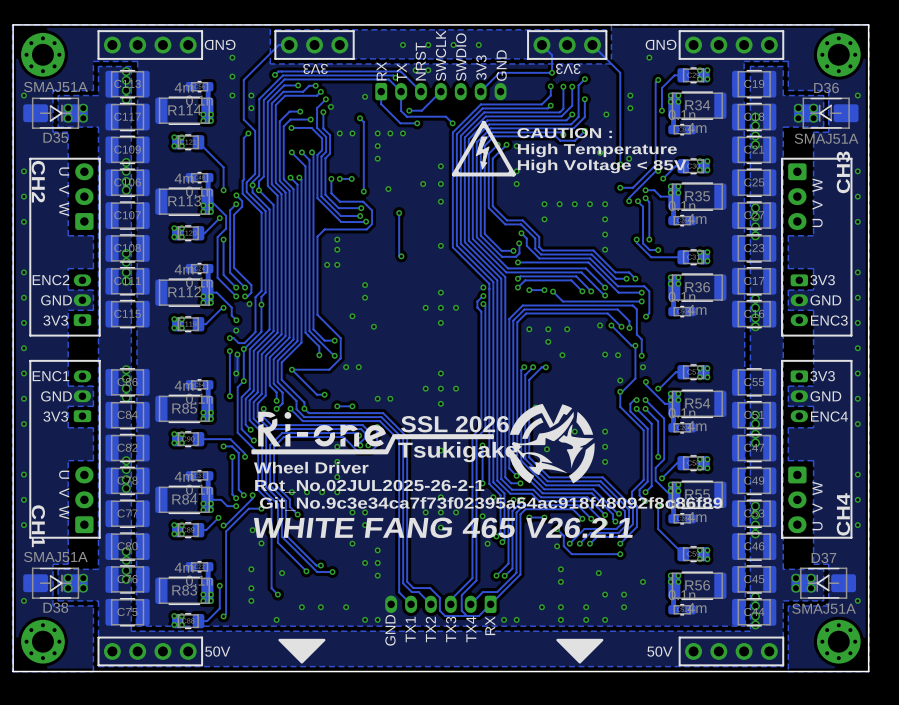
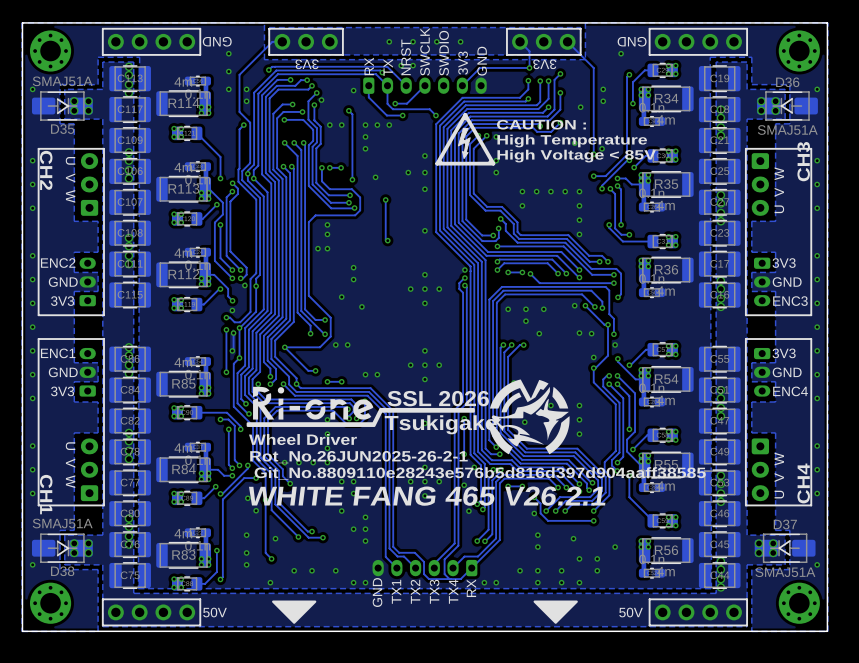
text: Rot_No.02JUL2025-26-2-1 (369, 486) -> Rot_No.26JUN2025-26-2-1 (358, 457)
text: Git_No.9c3e34ca7f73f02395a54ac918f48092f8c86f89 (491, 503) -> Git_No.8809110e28243e576b5d816d397d904aaff38585 (480, 473)

